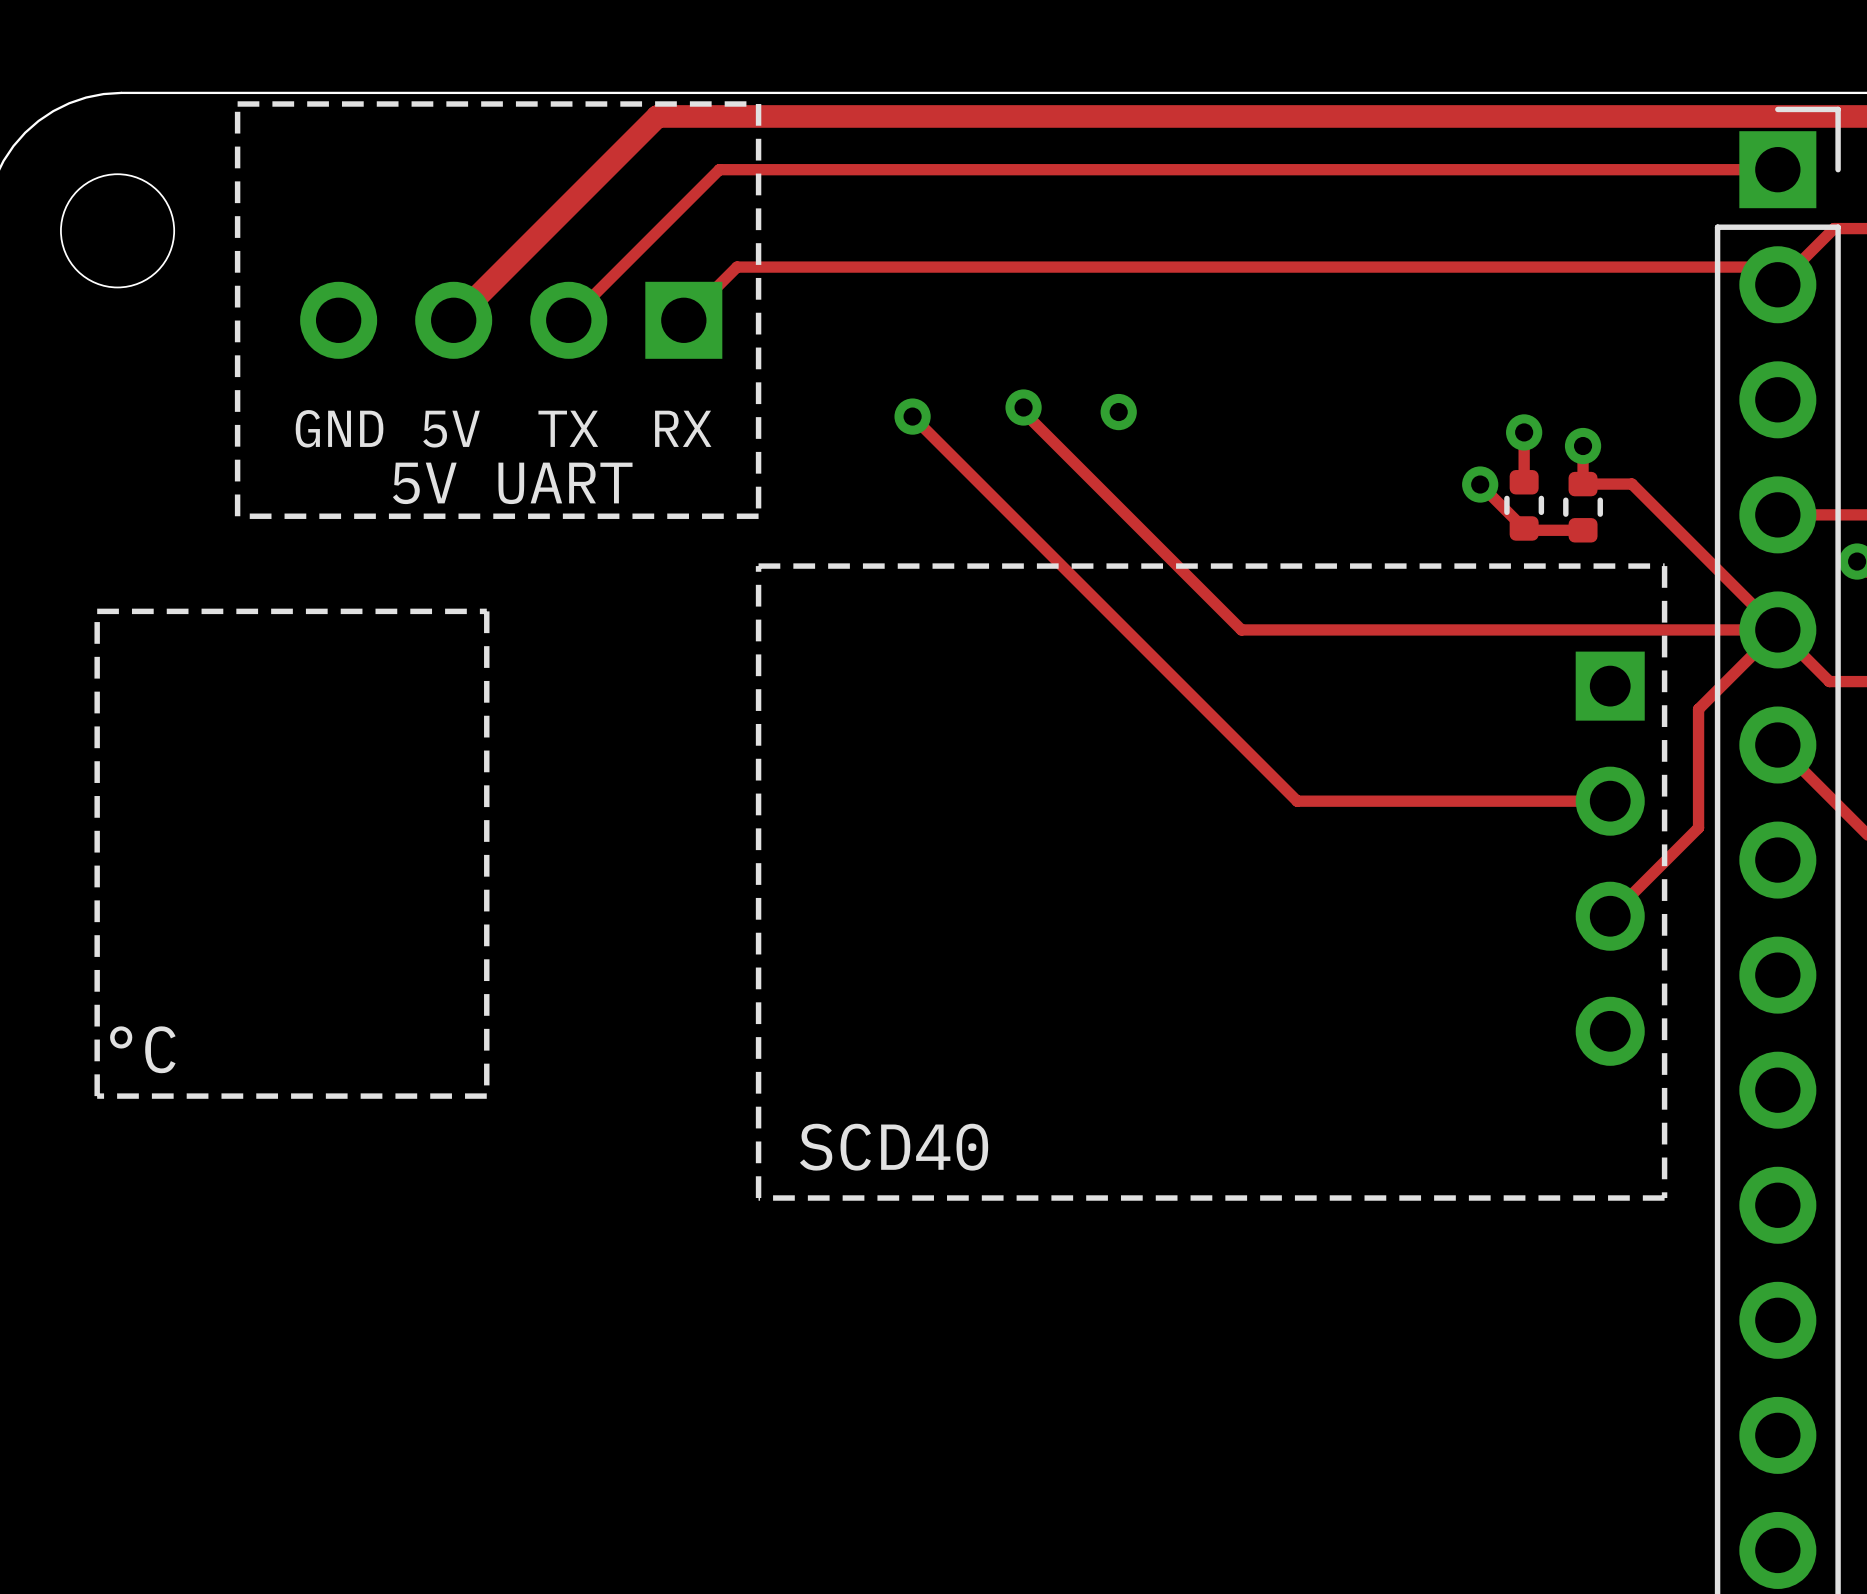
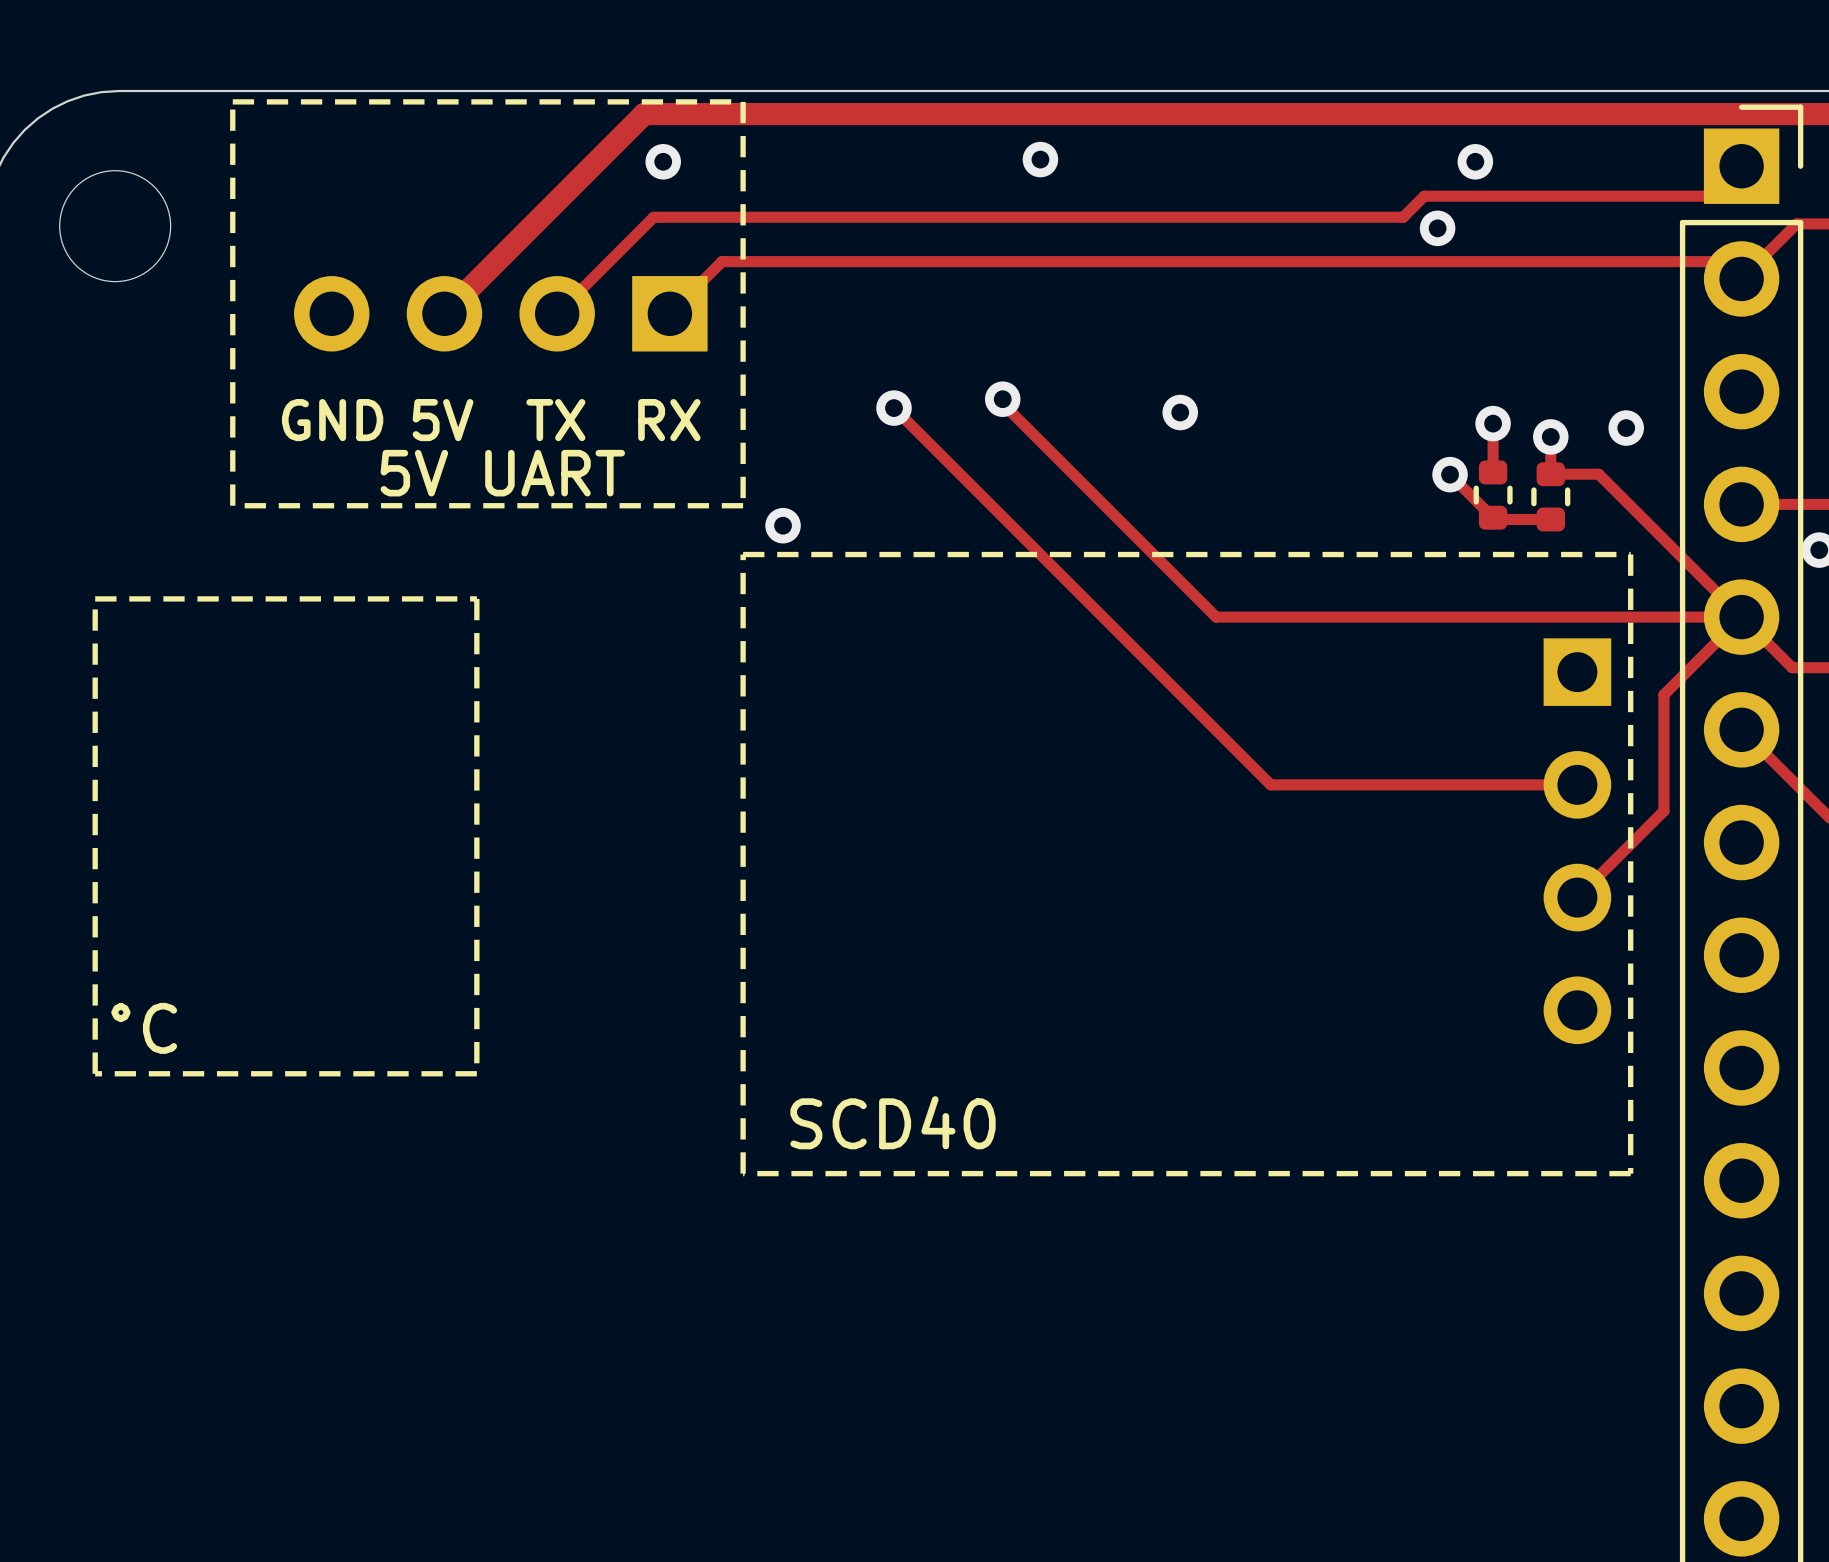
via: none -> (1040, 159)
via: none -> (663, 161)
via: none -> (1475, 161)
track: (1777, 169) (719, 169) (667, 221) -> (1741, 166) (1711, 196) (1424, 196) (1403, 217) (653, 217)
via: none -> (1437, 228)
via position: (1118, 412) -> (1180, 412)
via: none -> (1626, 428)
via: none -> (783, 525)

